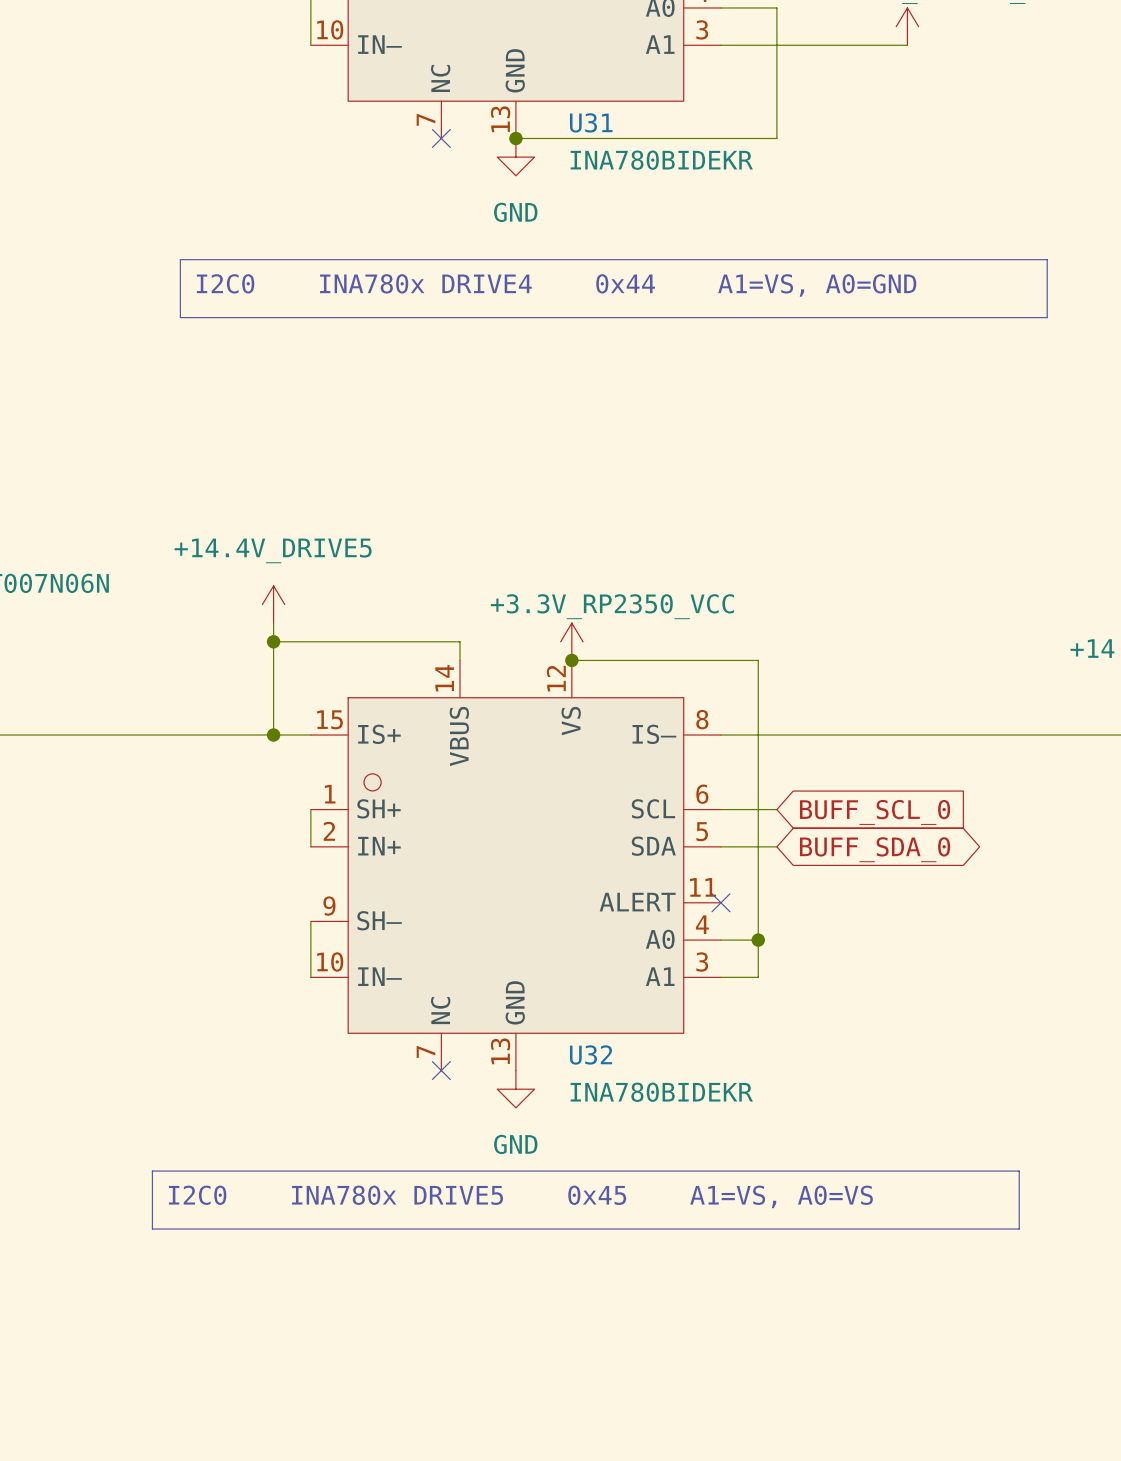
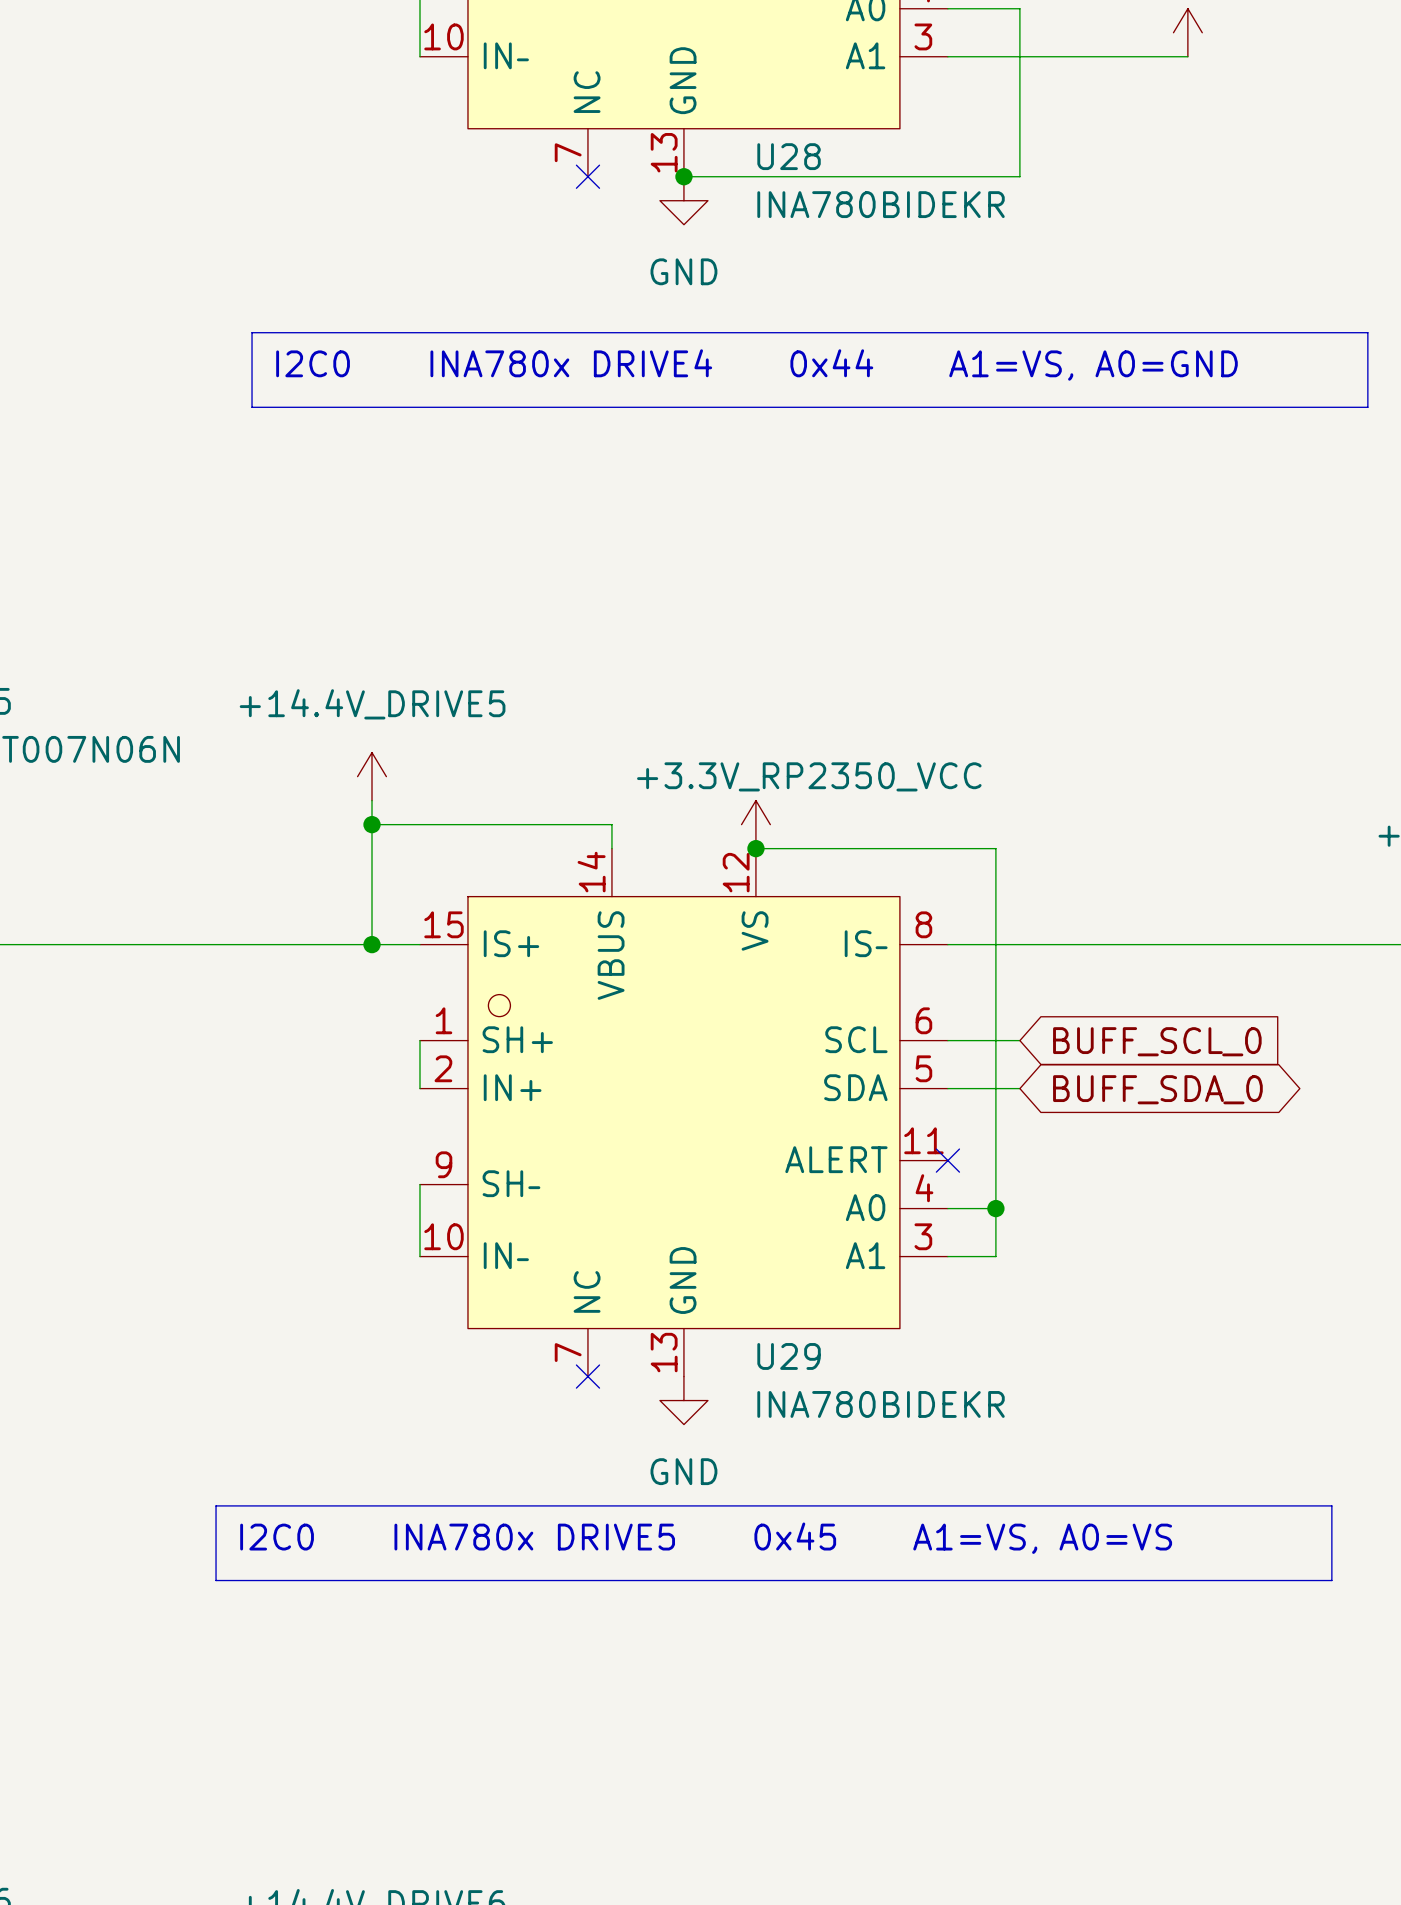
U31 name: U31 (591, 122) -> U28 (789, 156)
U32 name: U32 (591, 1054) -> U29 (789, 1356)

